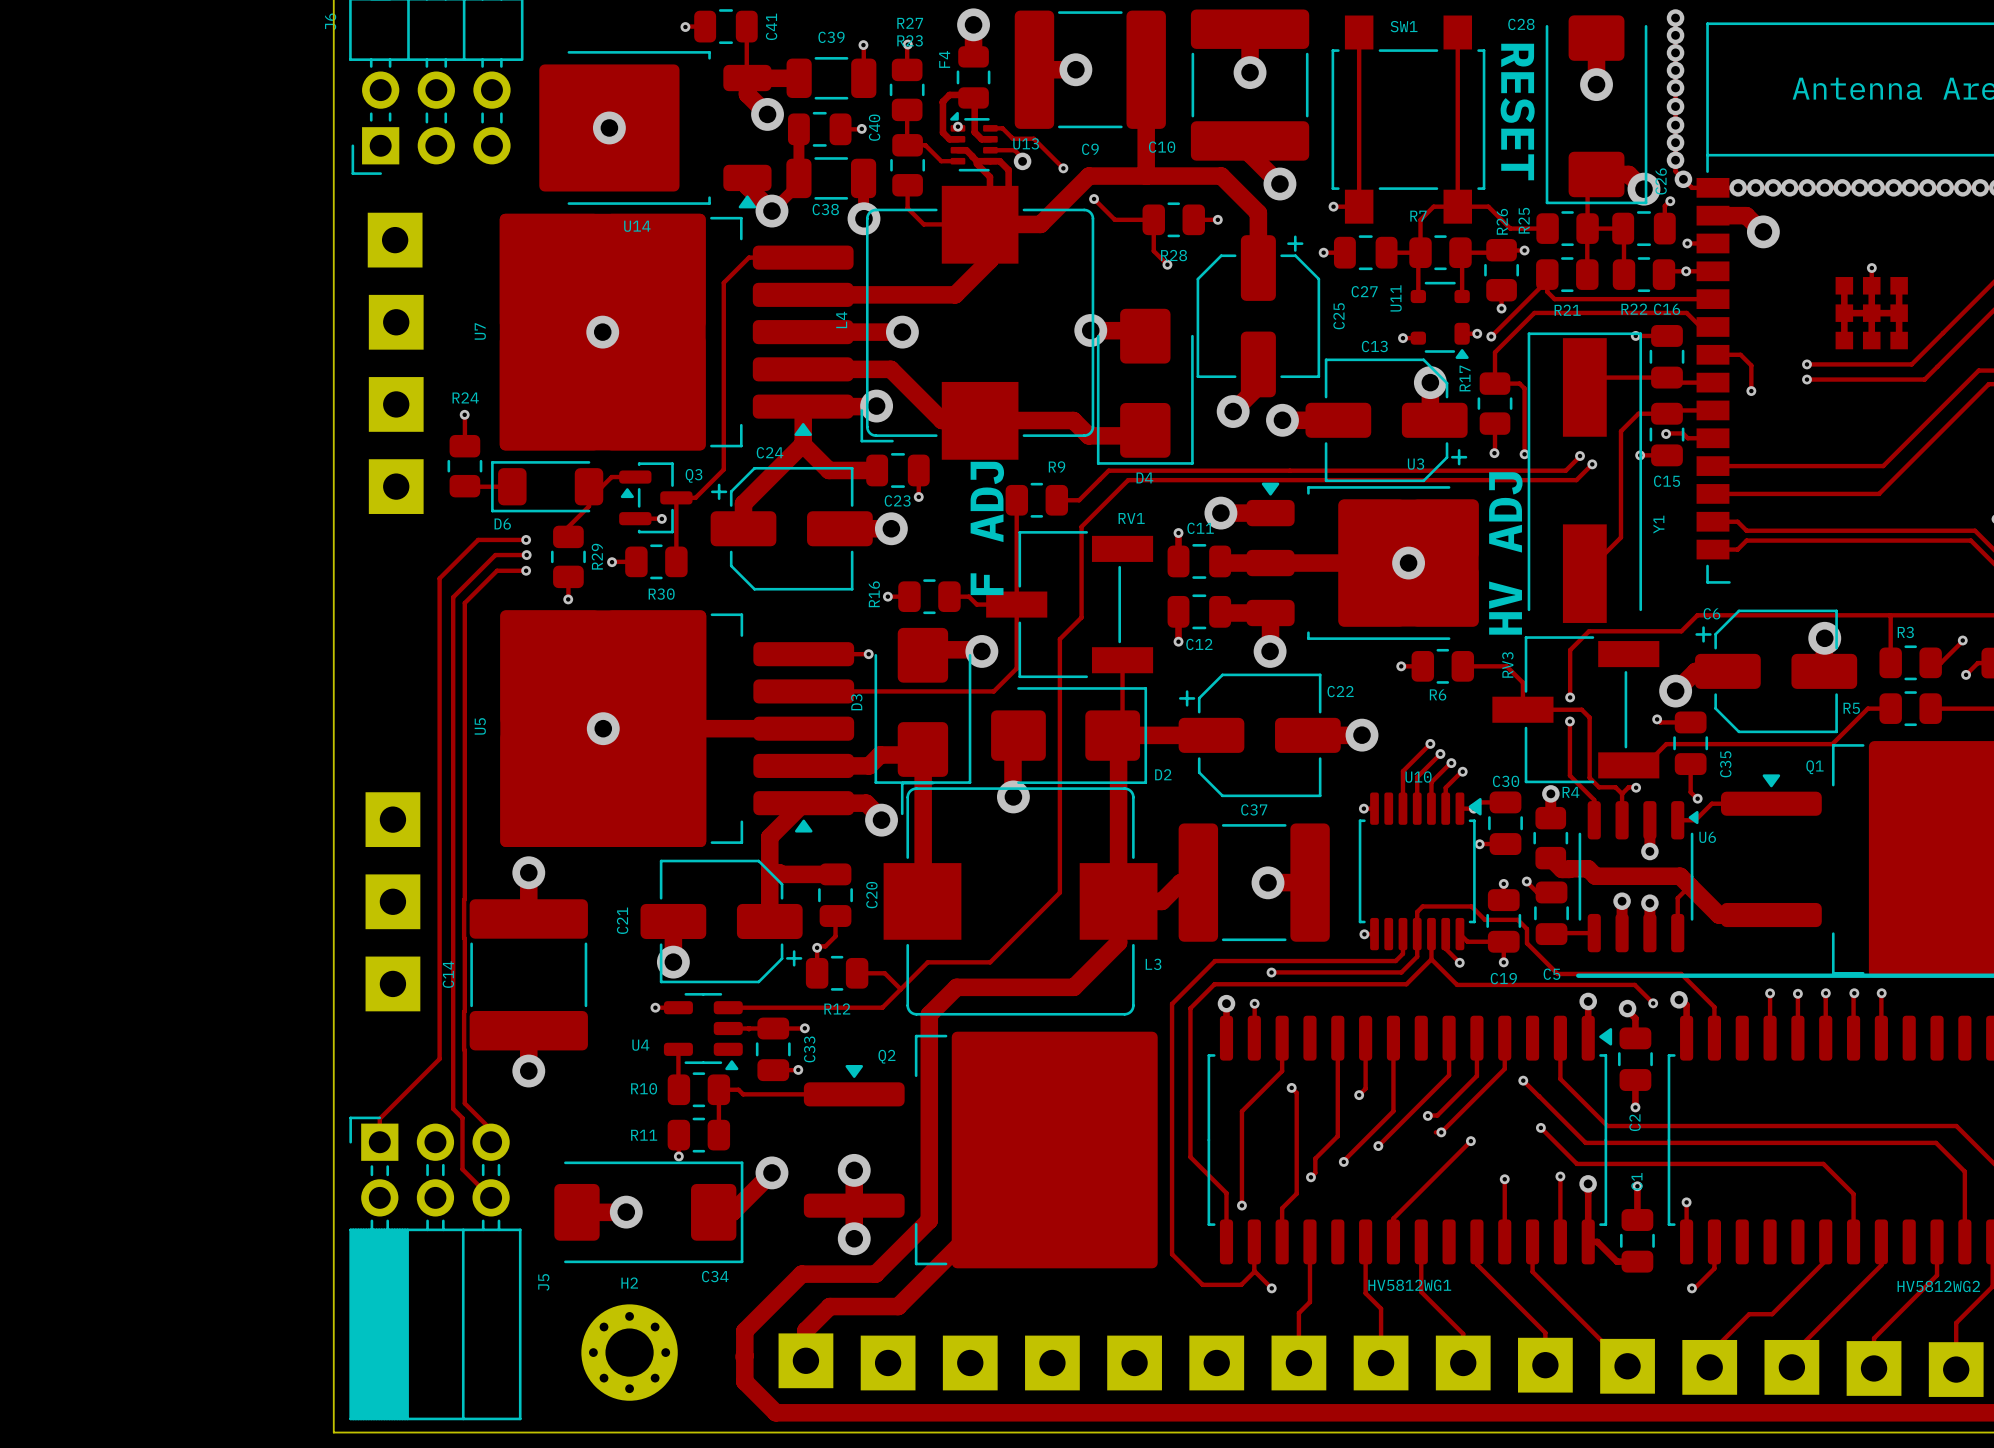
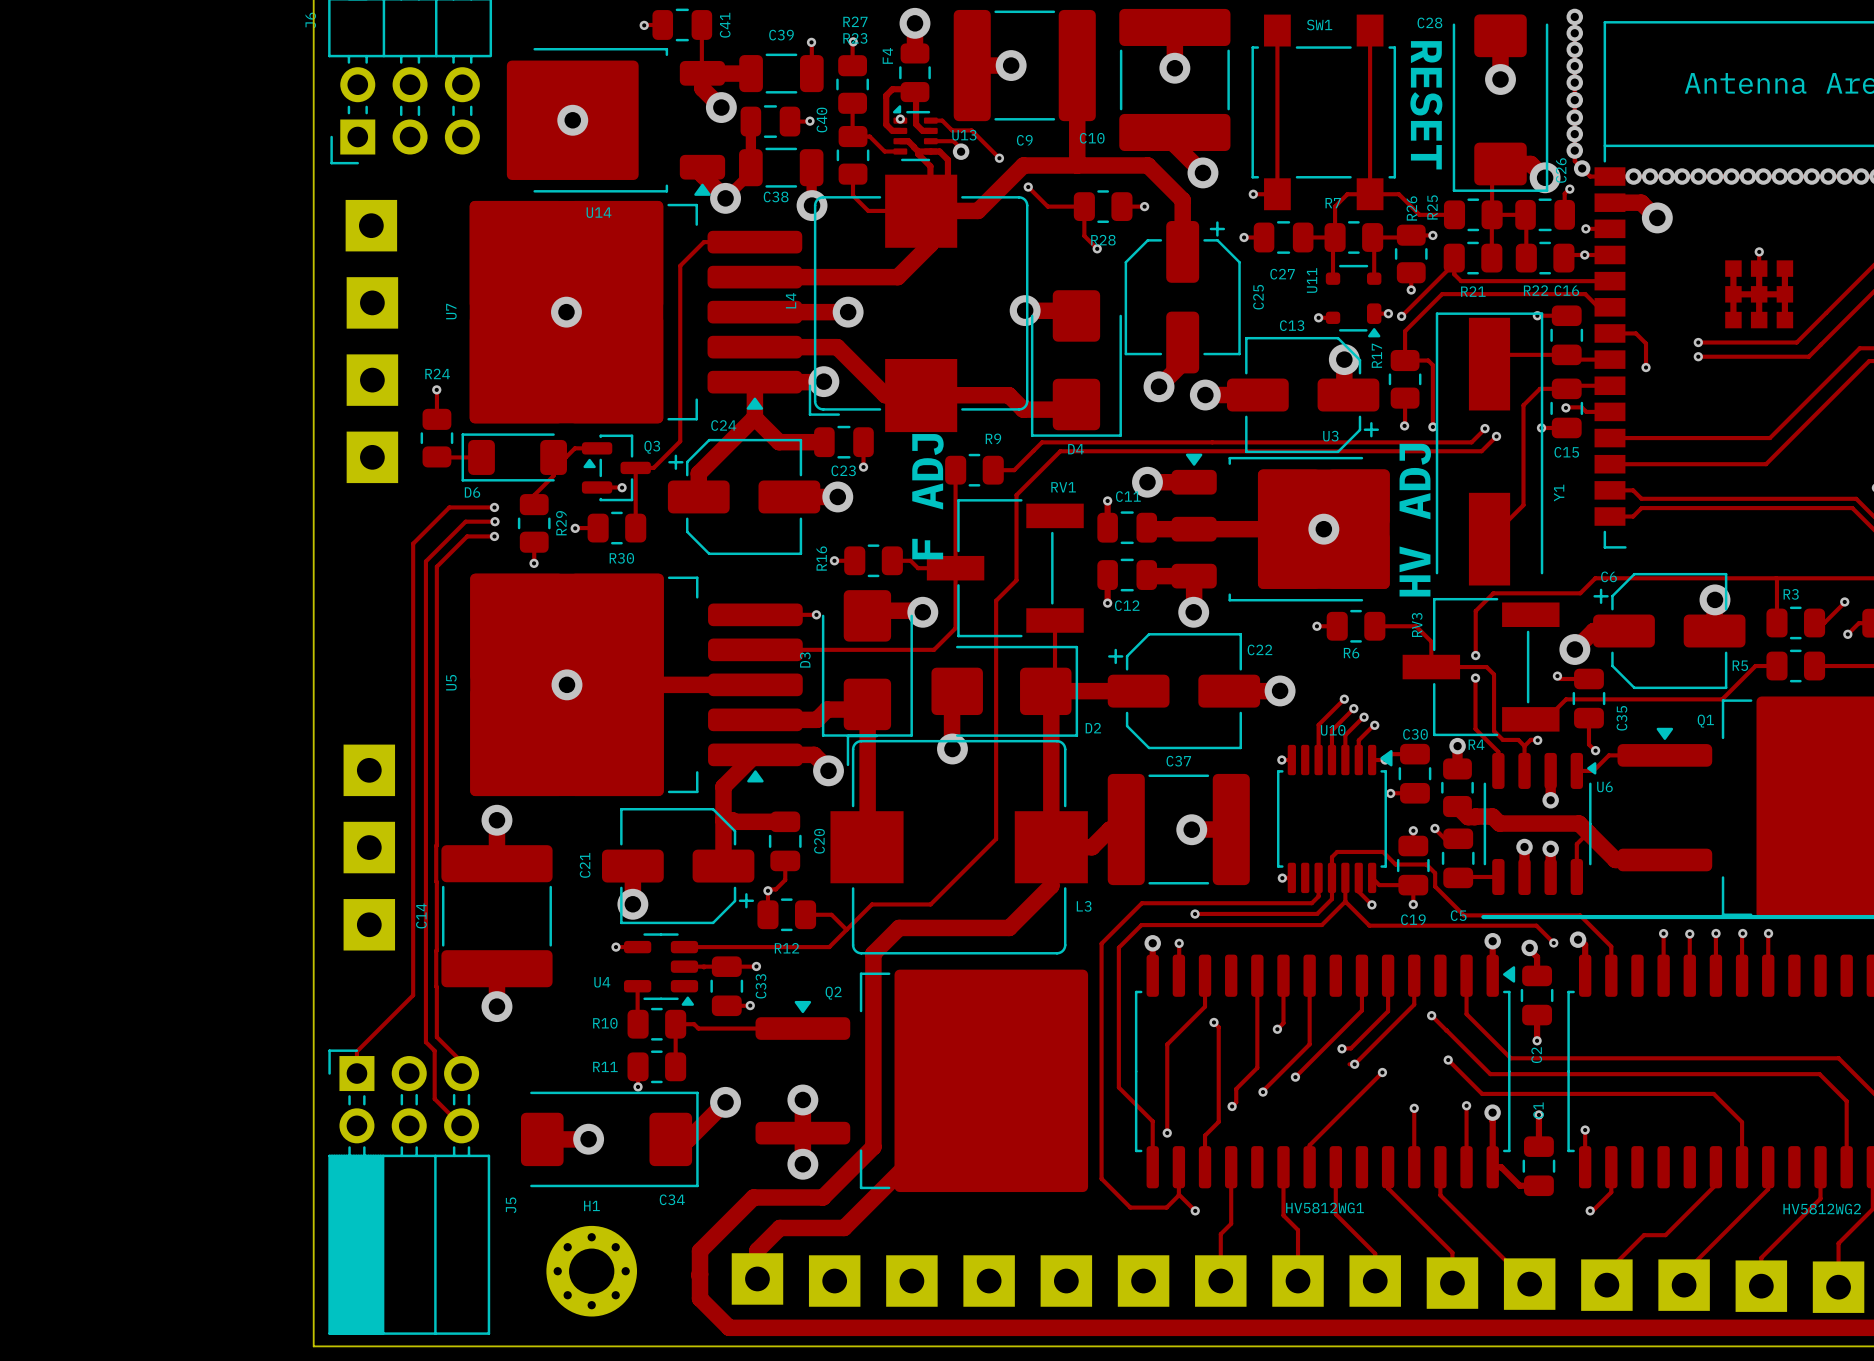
H2 name: H2 (629, 1283) -> H1 (591, 1205)

